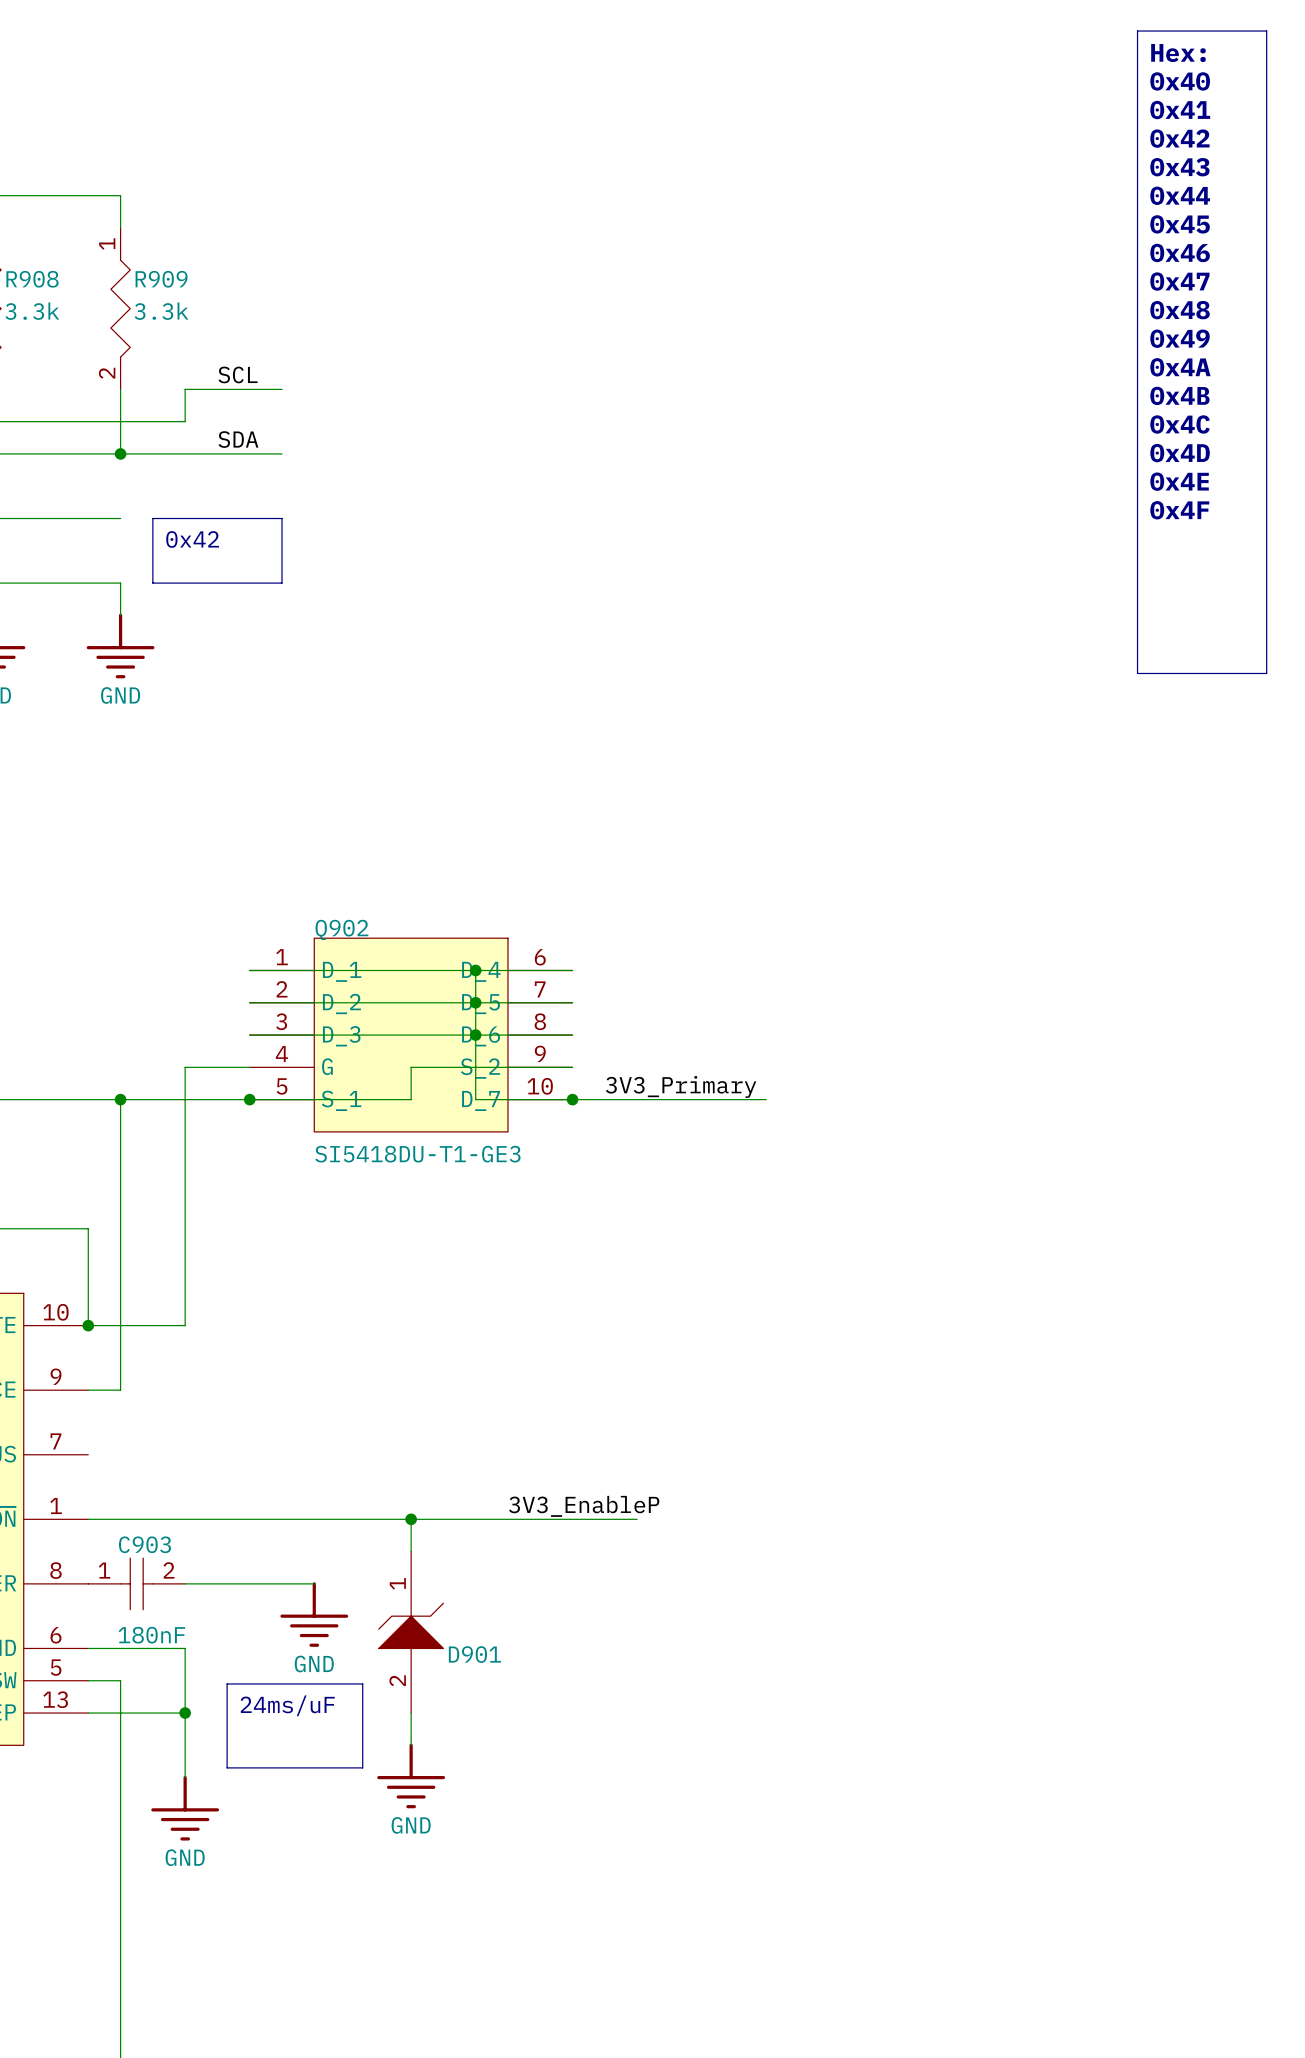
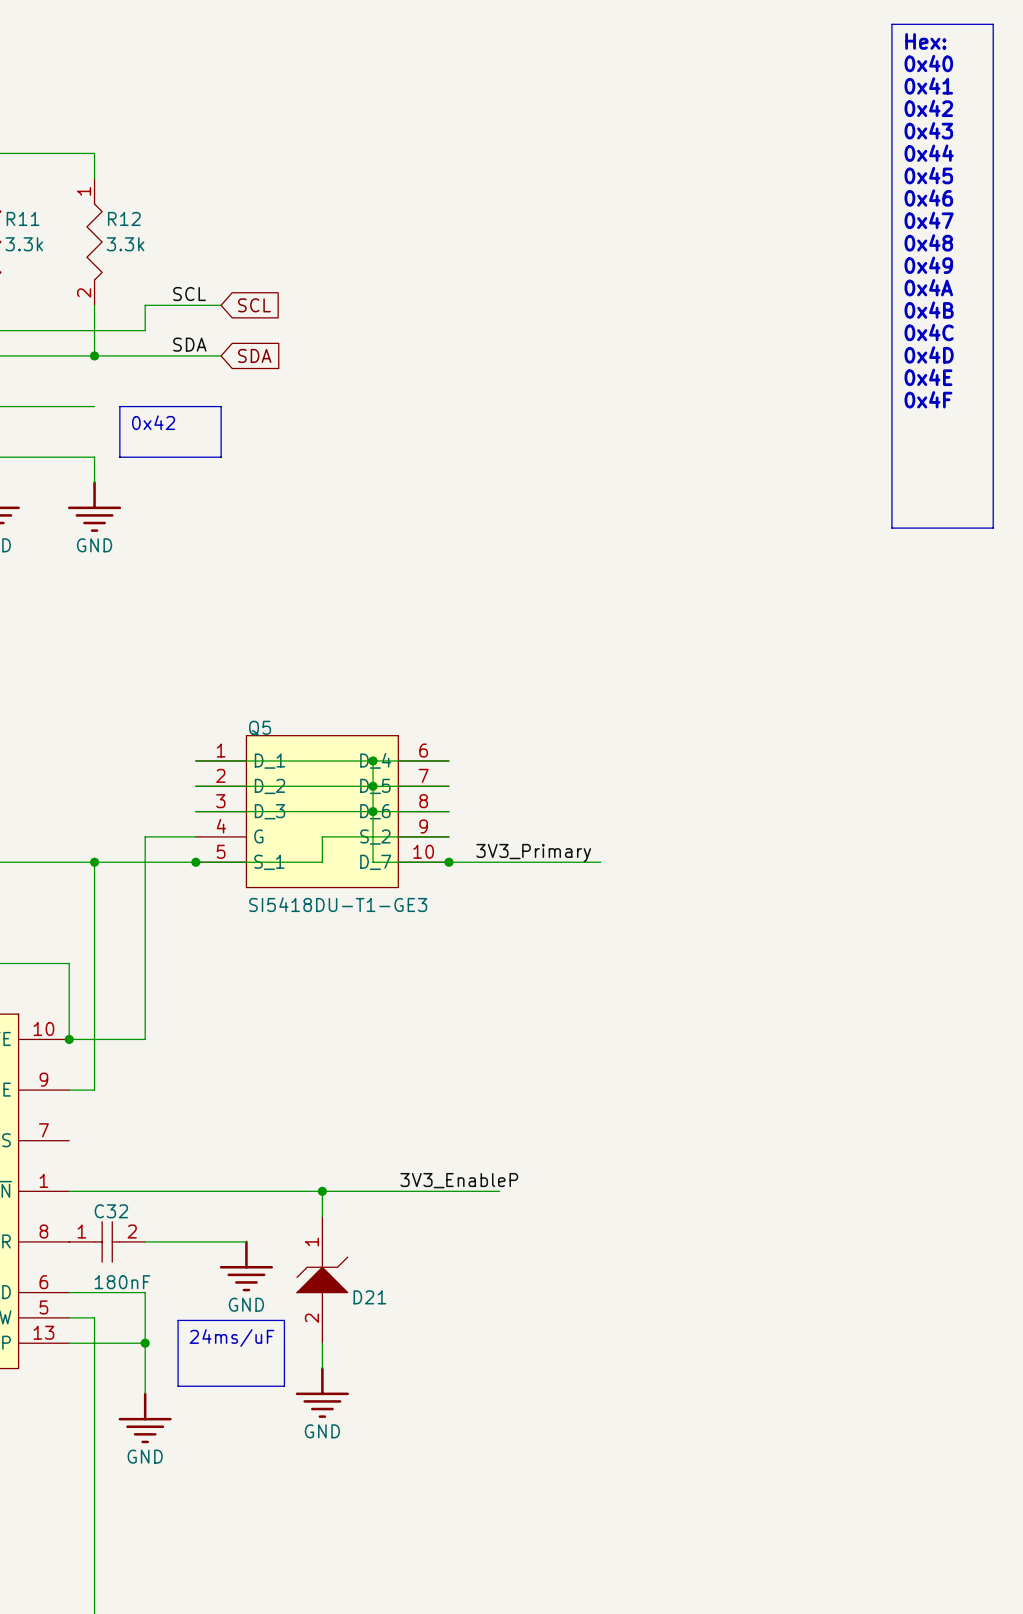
R908 name: R908 (32, 279) -> R11 (23, 218)
R909 name: R909 (161, 279) -> R12 (124, 218)
global label: none -> SCL (254, 305)
global label: none -> SDA (254, 355)
Q902 name: Q902 (341, 929) -> Q5 (260, 728)
C903 name: C903 (144, 1544) -> C32 (111, 1211)
D901 name: D901 (474, 1654) -> D21 (369, 1297)

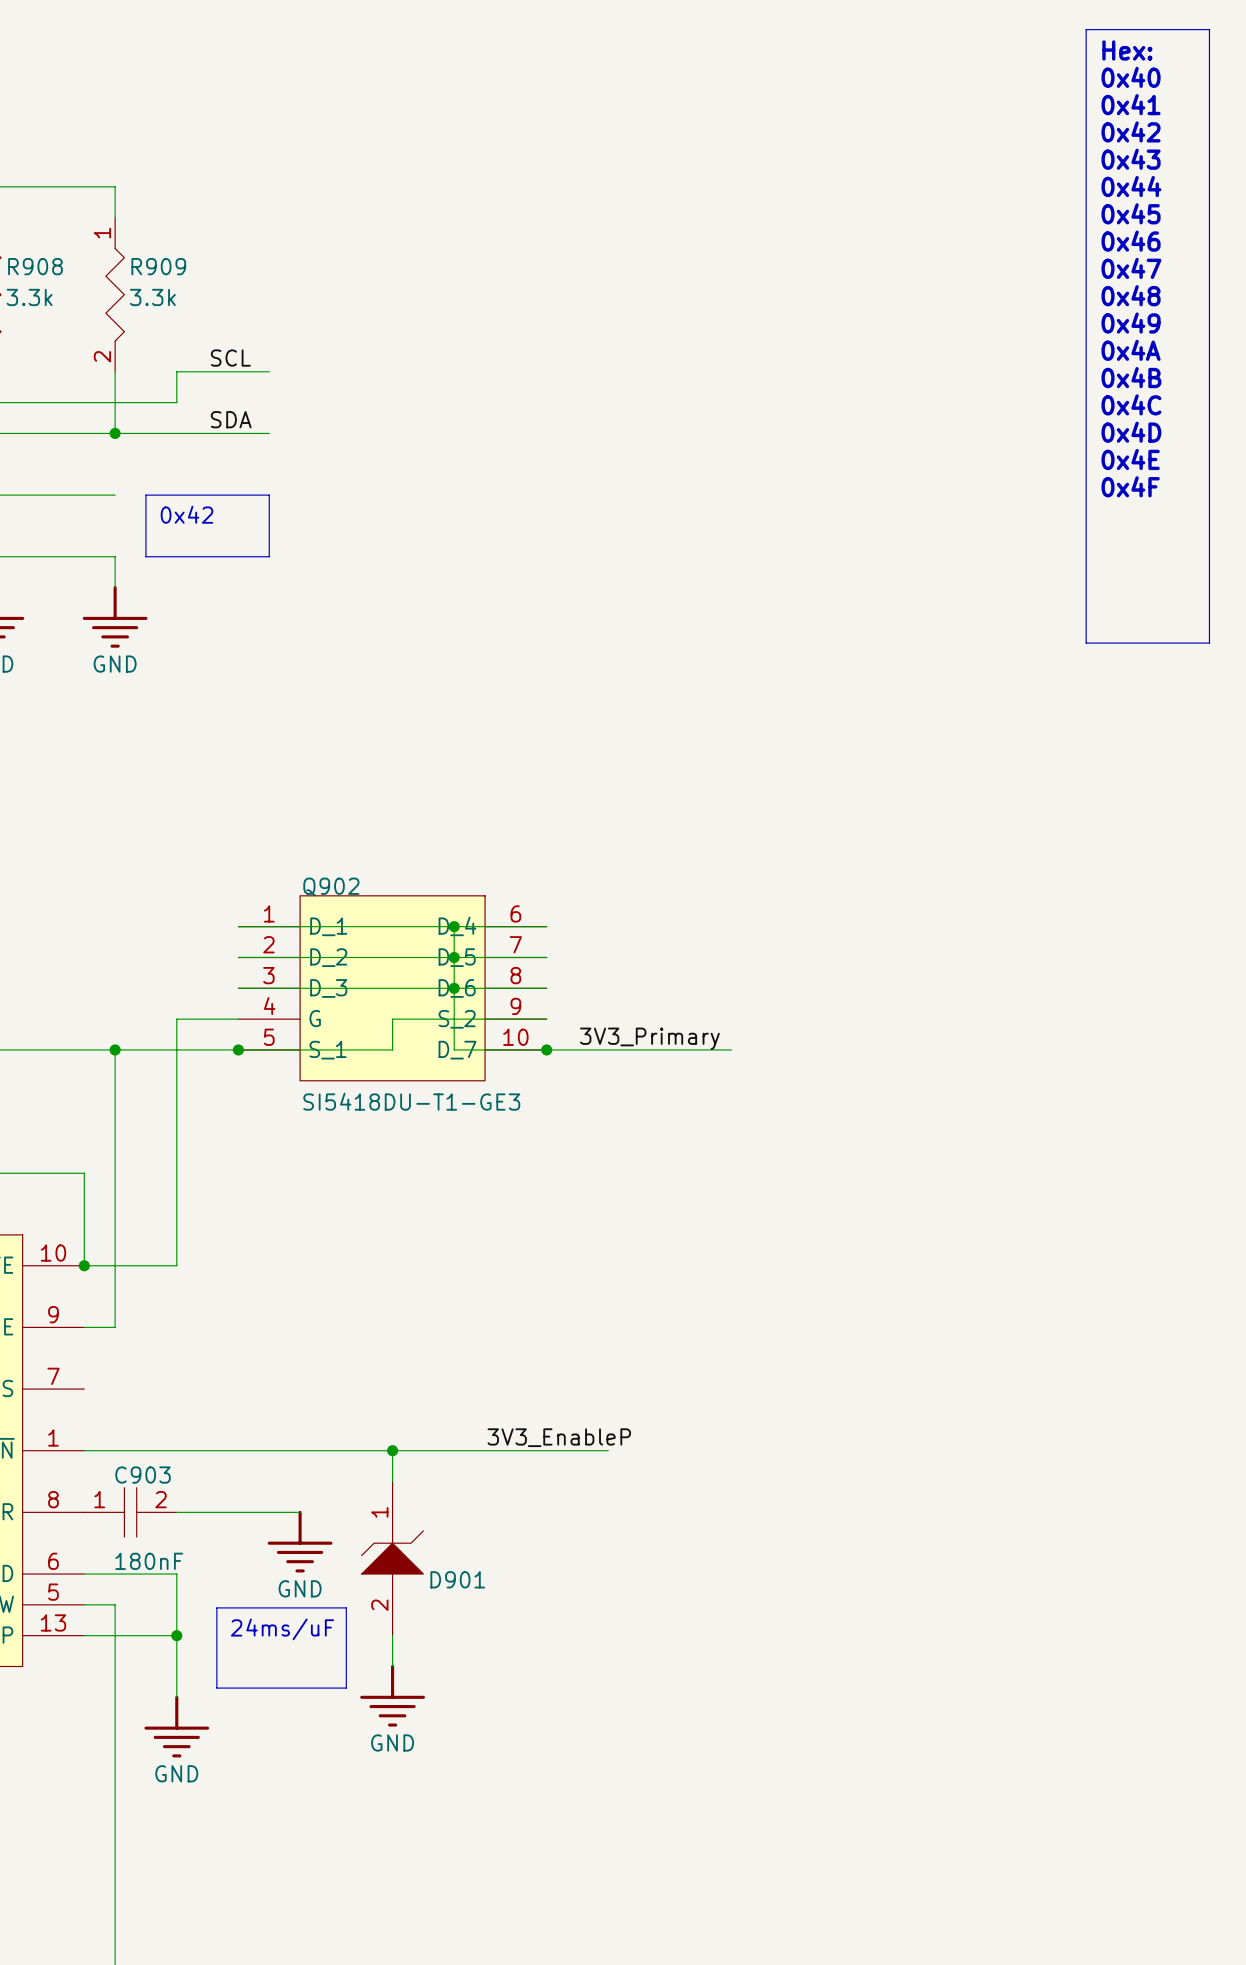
R11 name: R11 (23, 218) -> R908 (35, 266)
R12 name: R12 (124, 218) -> R909 (158, 266)
global label: SCL (254, 305) -> none
global label: SDA (254, 355) -> none
Q5 name: Q5 (260, 728) -> Q902 (331, 886)
C32 name: C32 (111, 1211) -> C903 (142, 1475)
D21 name: D21 (369, 1297) -> D901 (457, 1579)

